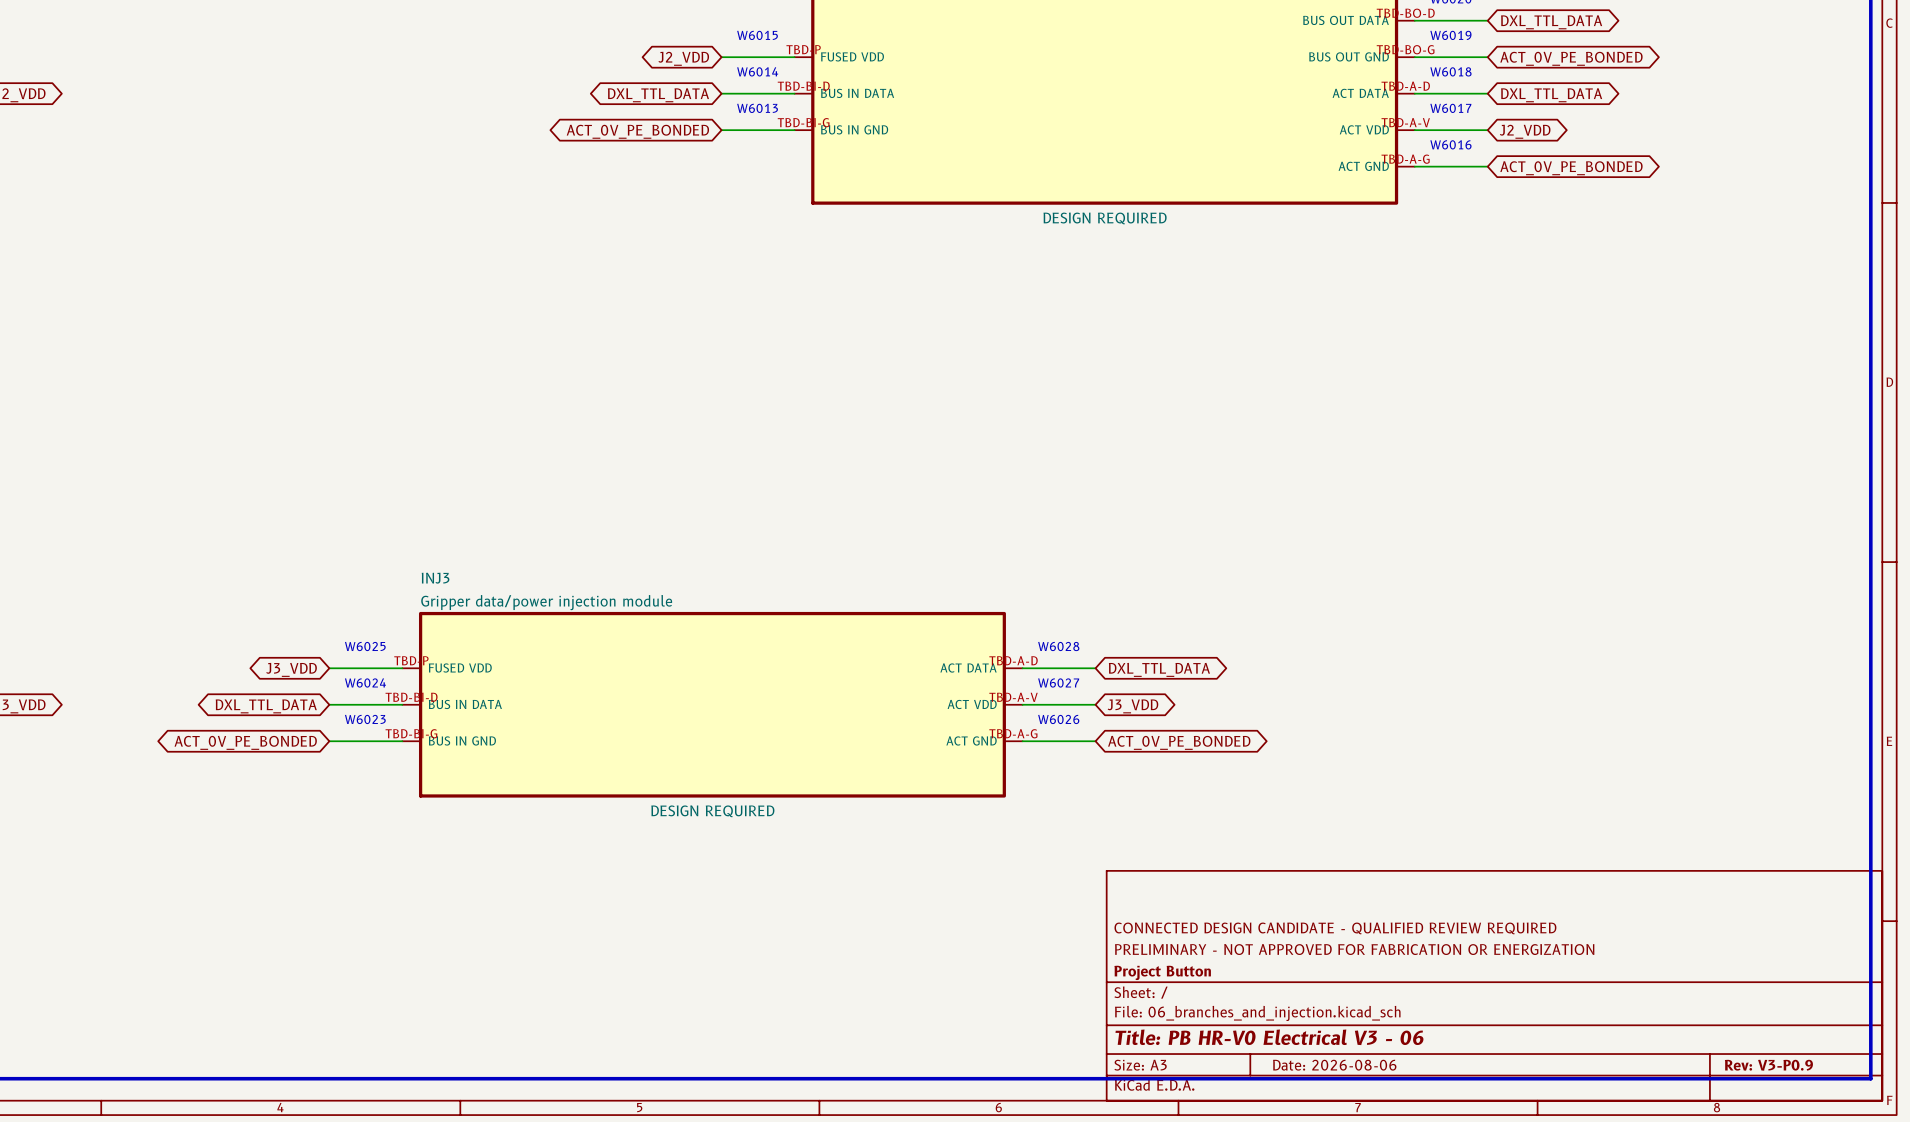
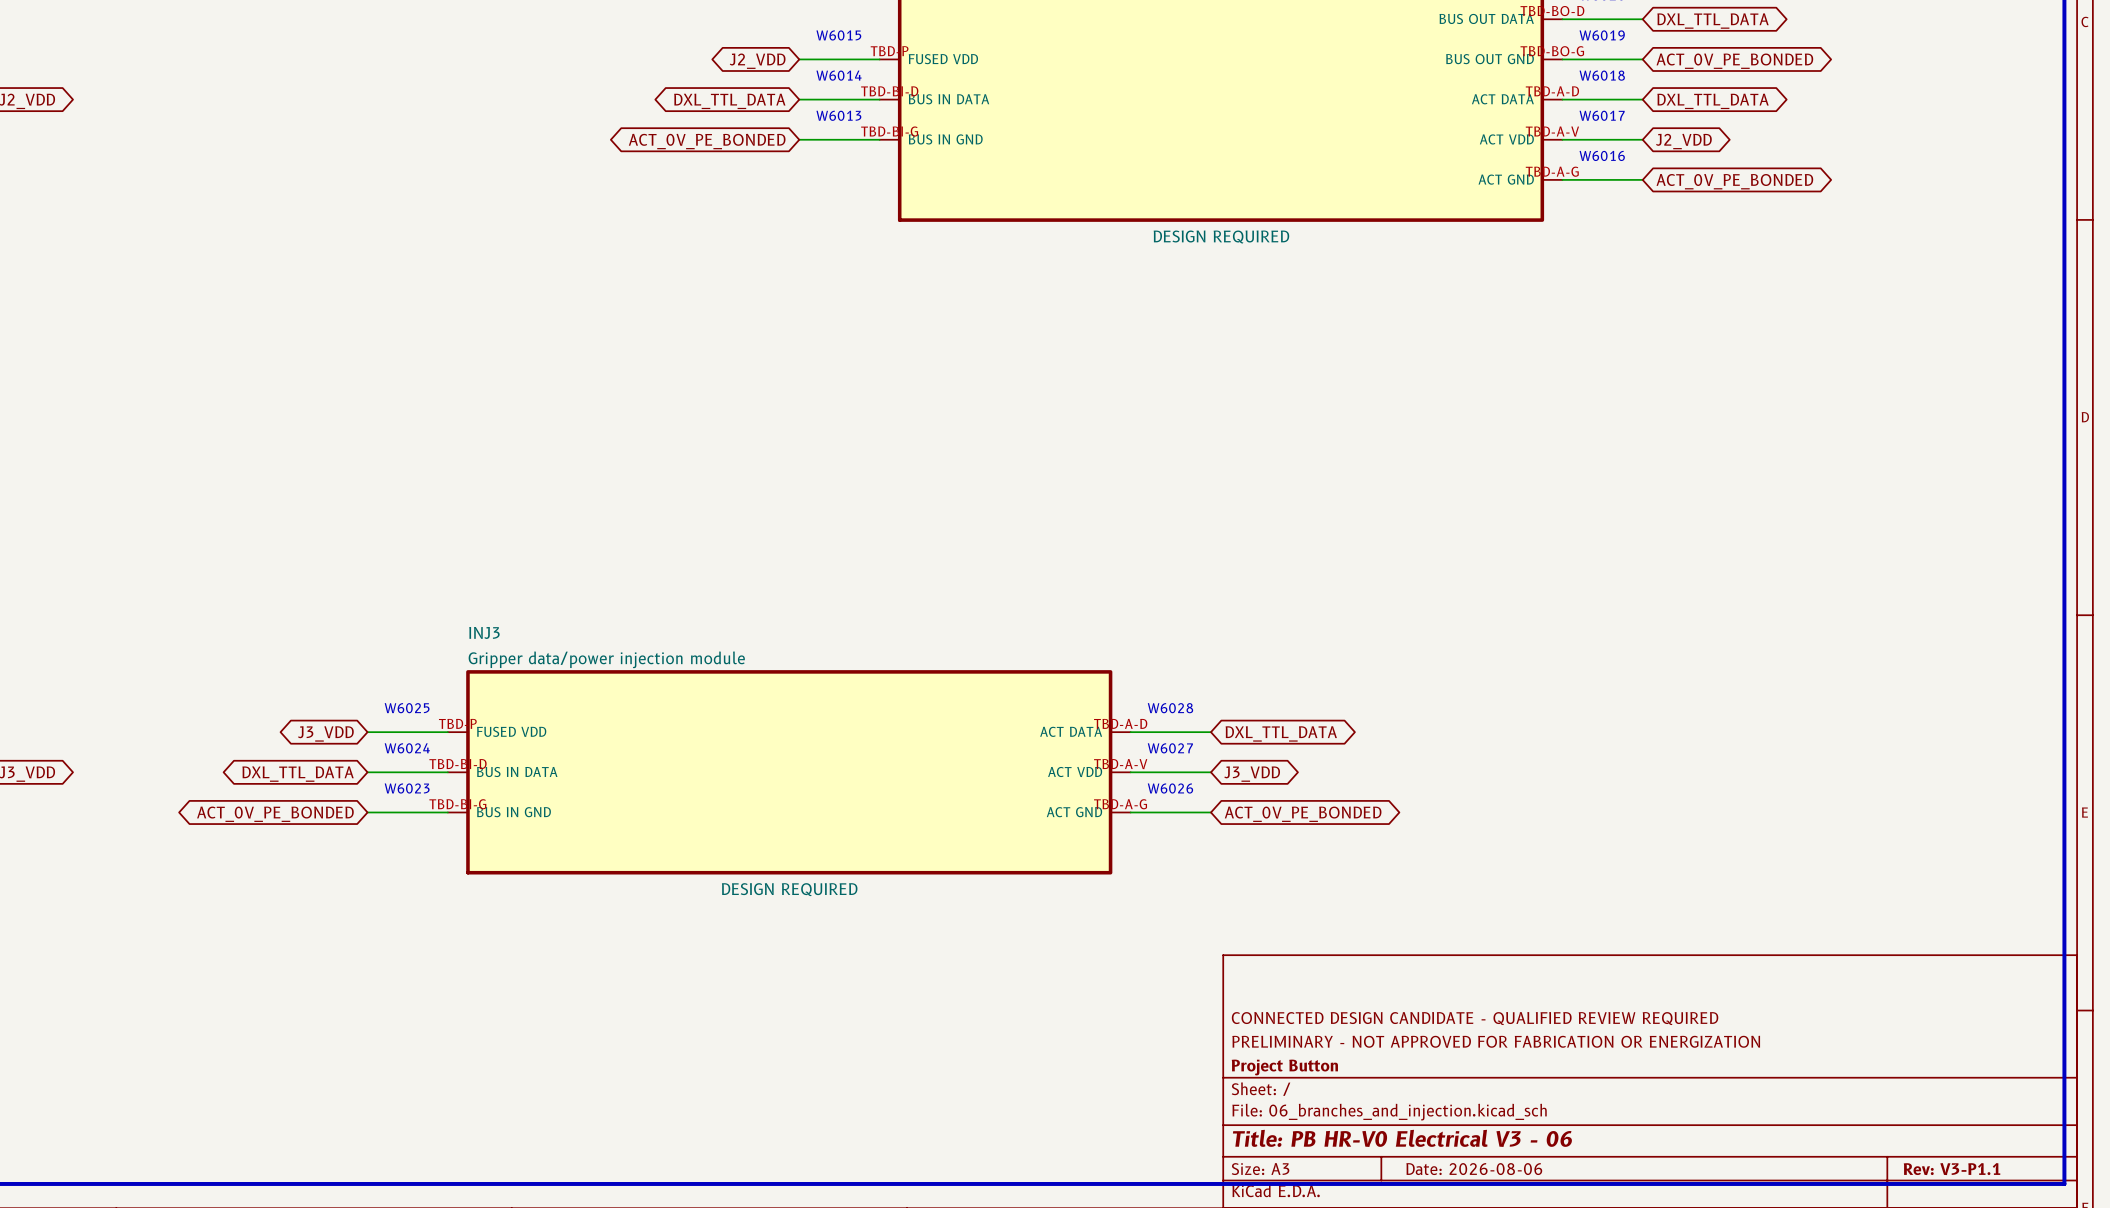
title block: Rev: V3-P0.9 (1768, 1065) -> Rev: V3-P1.1 (1952, 1169)

